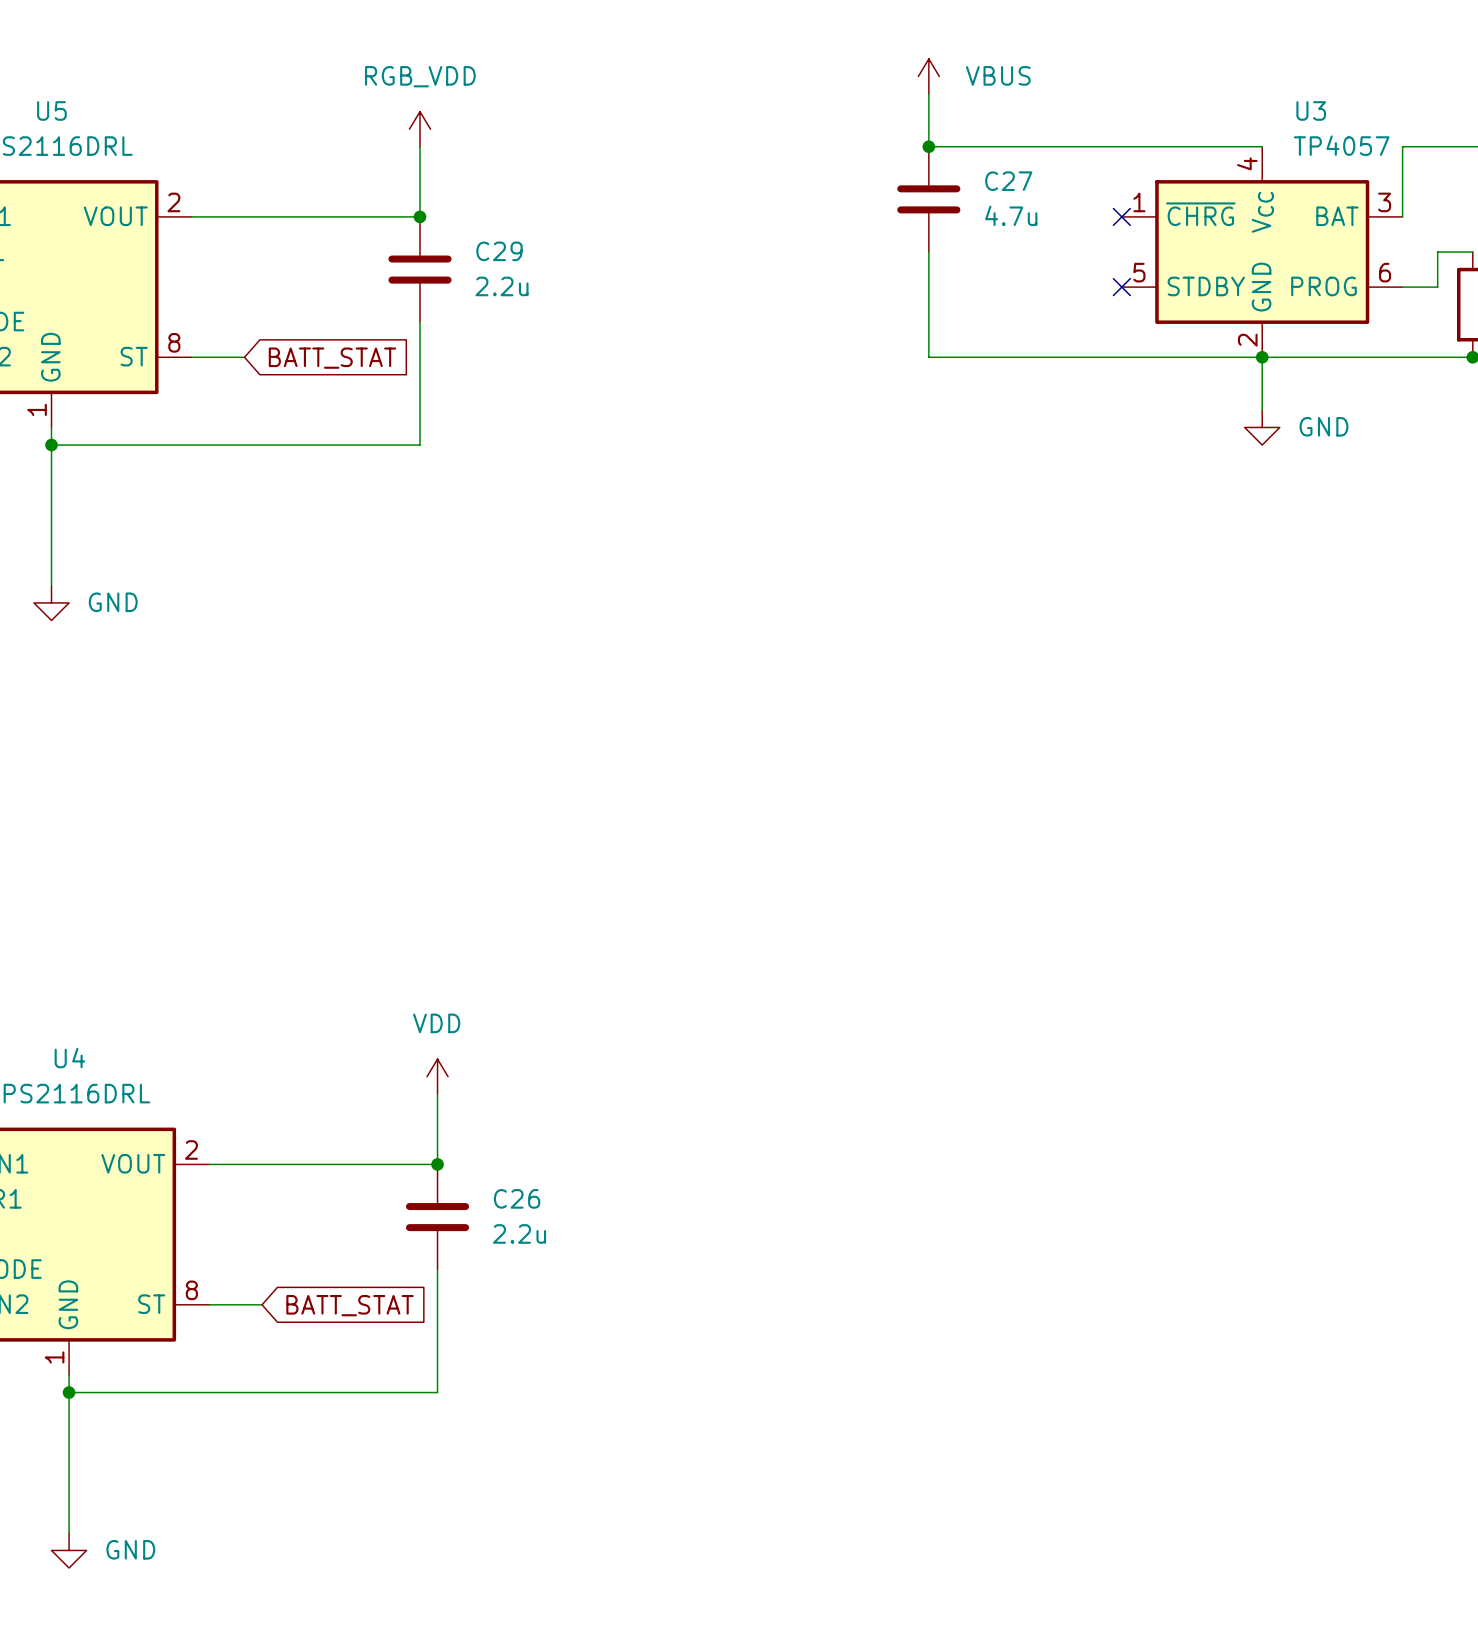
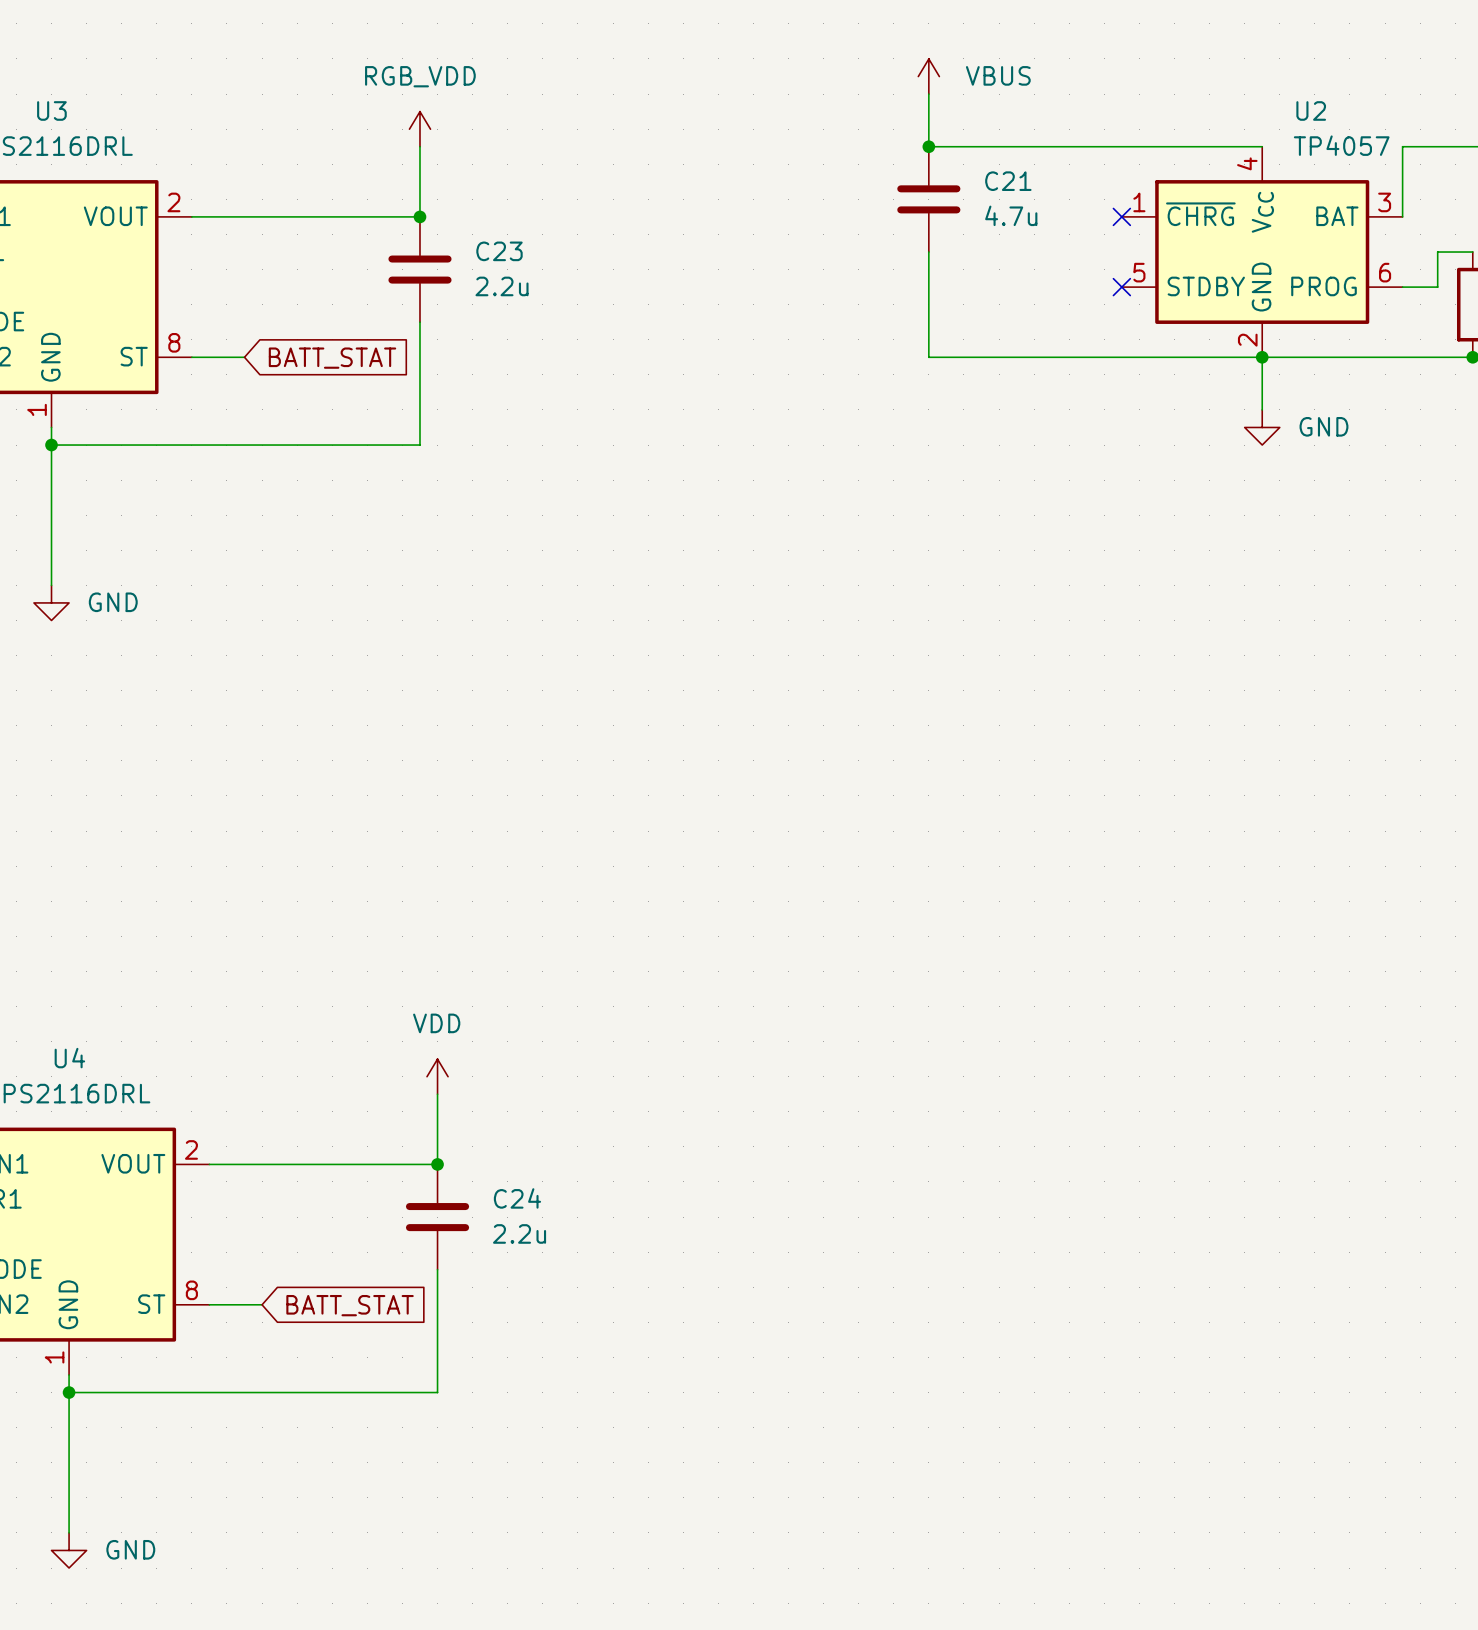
U5 name: U5 (51, 110) -> U3 (51, 110)
U3 name: U3 (1311, 110) -> U2 (1311, 110)
C27 name: C27 (1008, 181) -> C21 (1008, 181)
C29 name: C29 (499, 251) -> C23 (499, 251)
C26 name: C26 (517, 1198) -> C24 (517, 1198)

